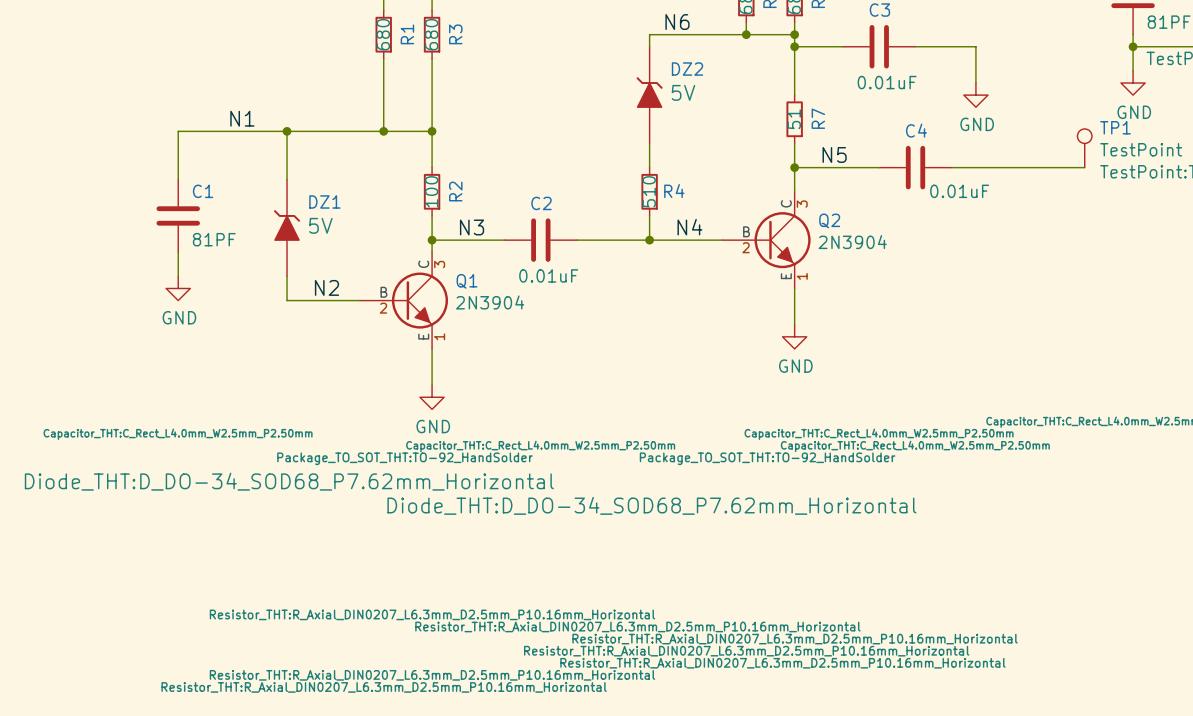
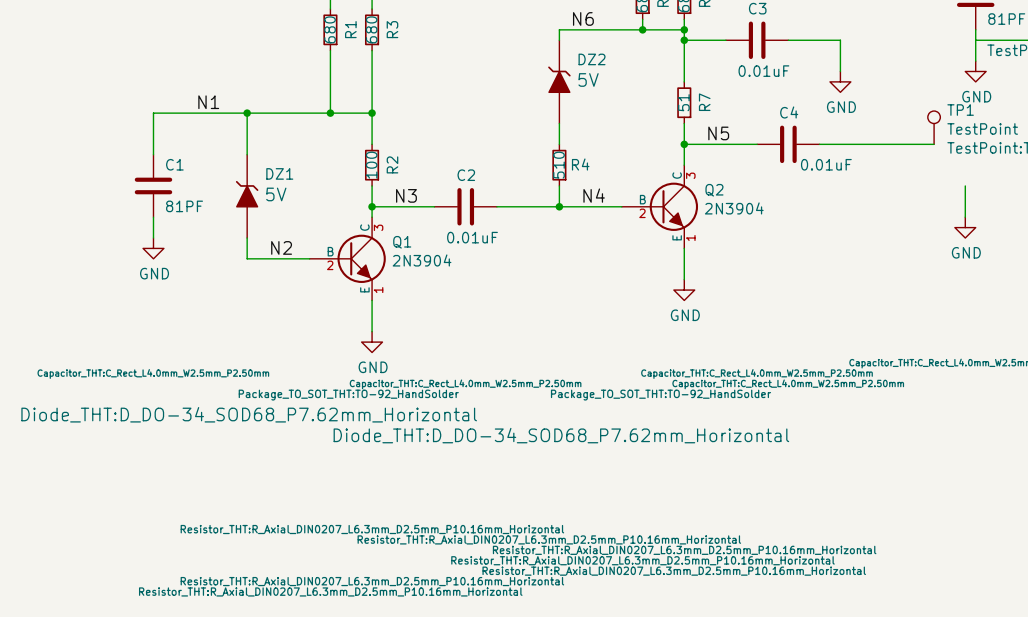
junction: (1133, 46) -> none
wire: none -> (965, 185) (965, 217)
power symbol: none -> GND (965, 227)

